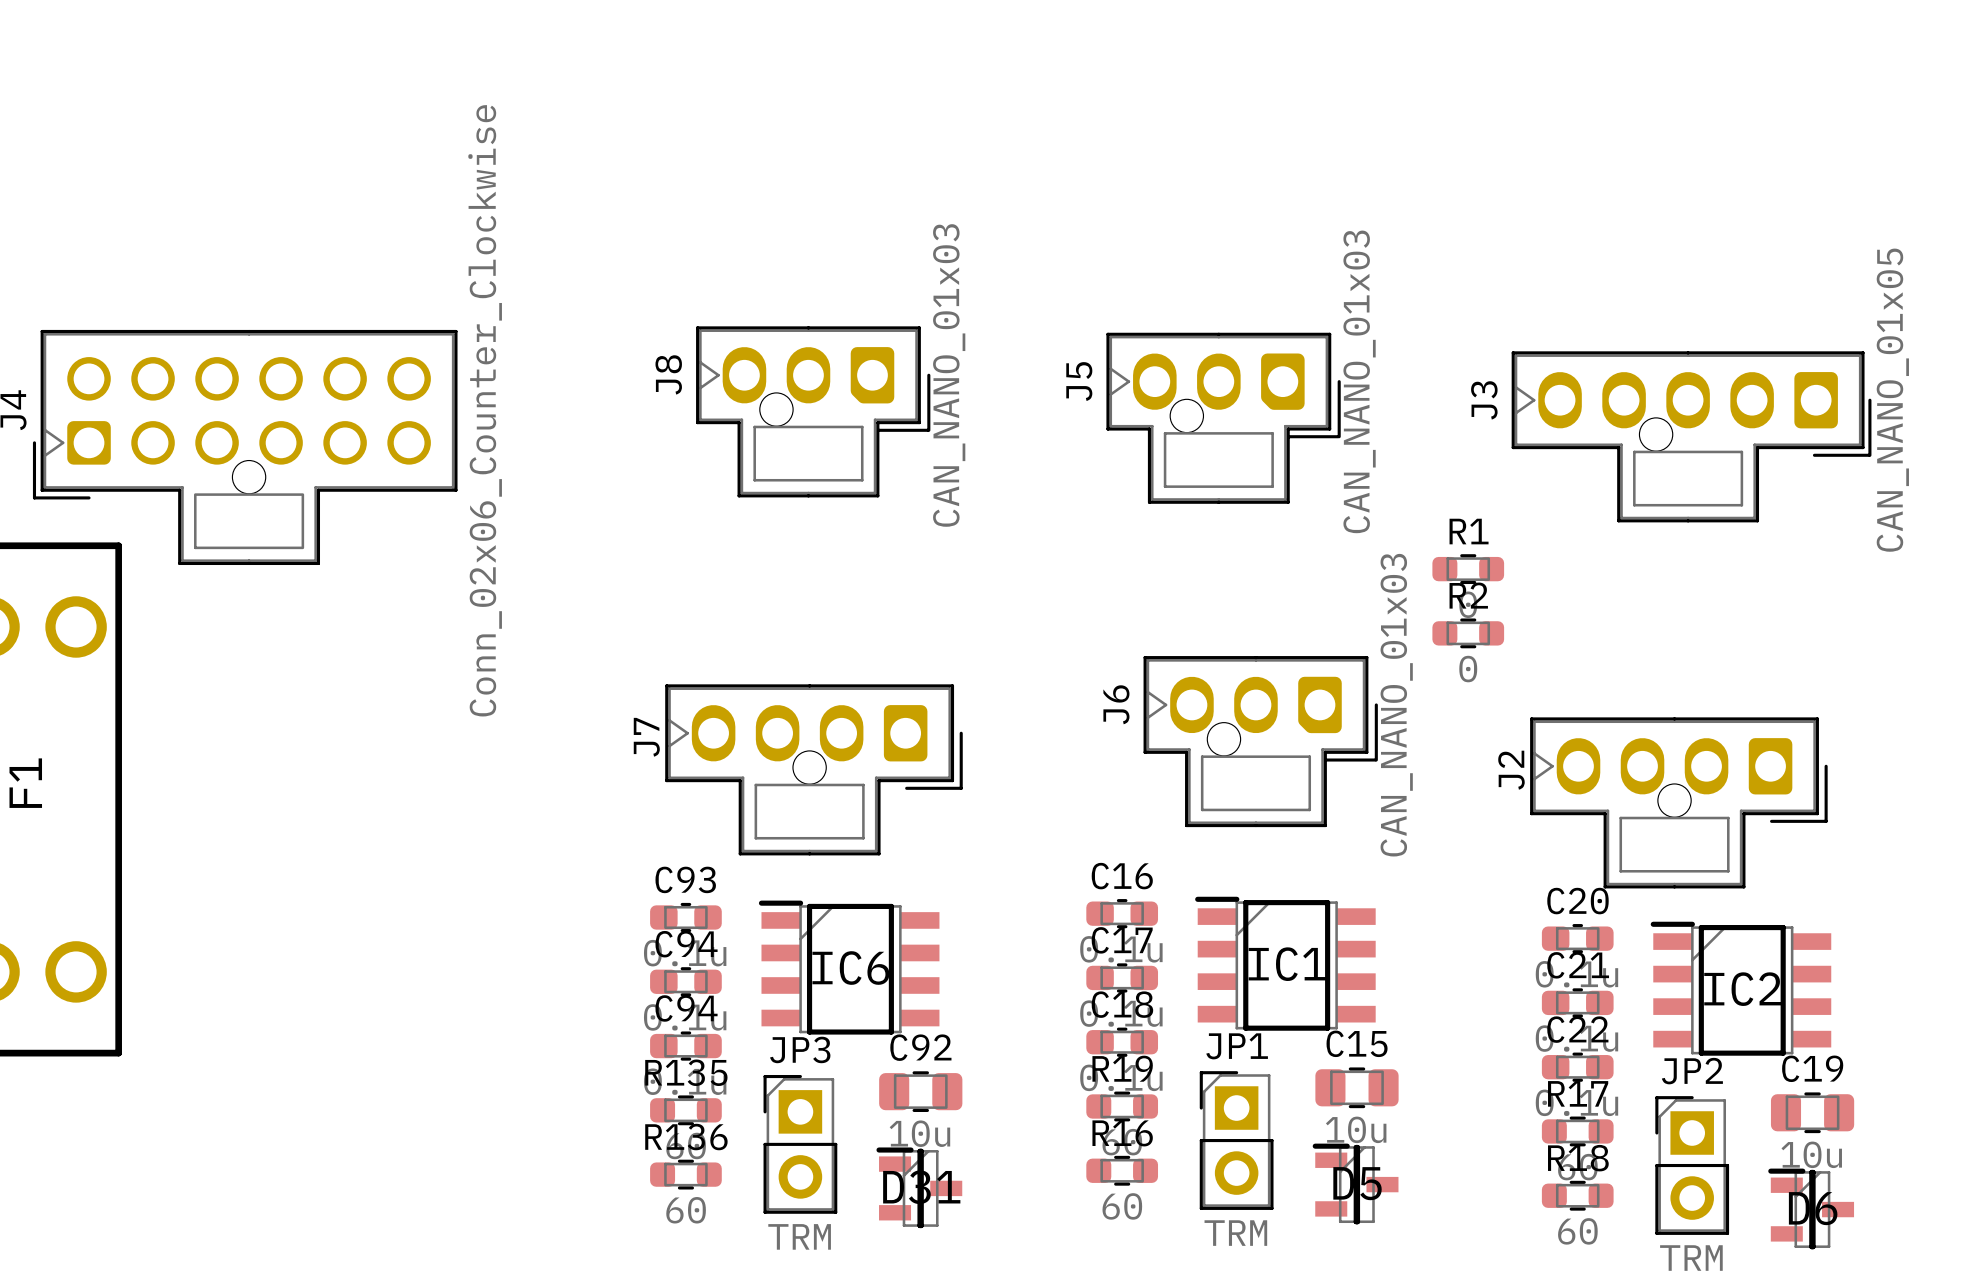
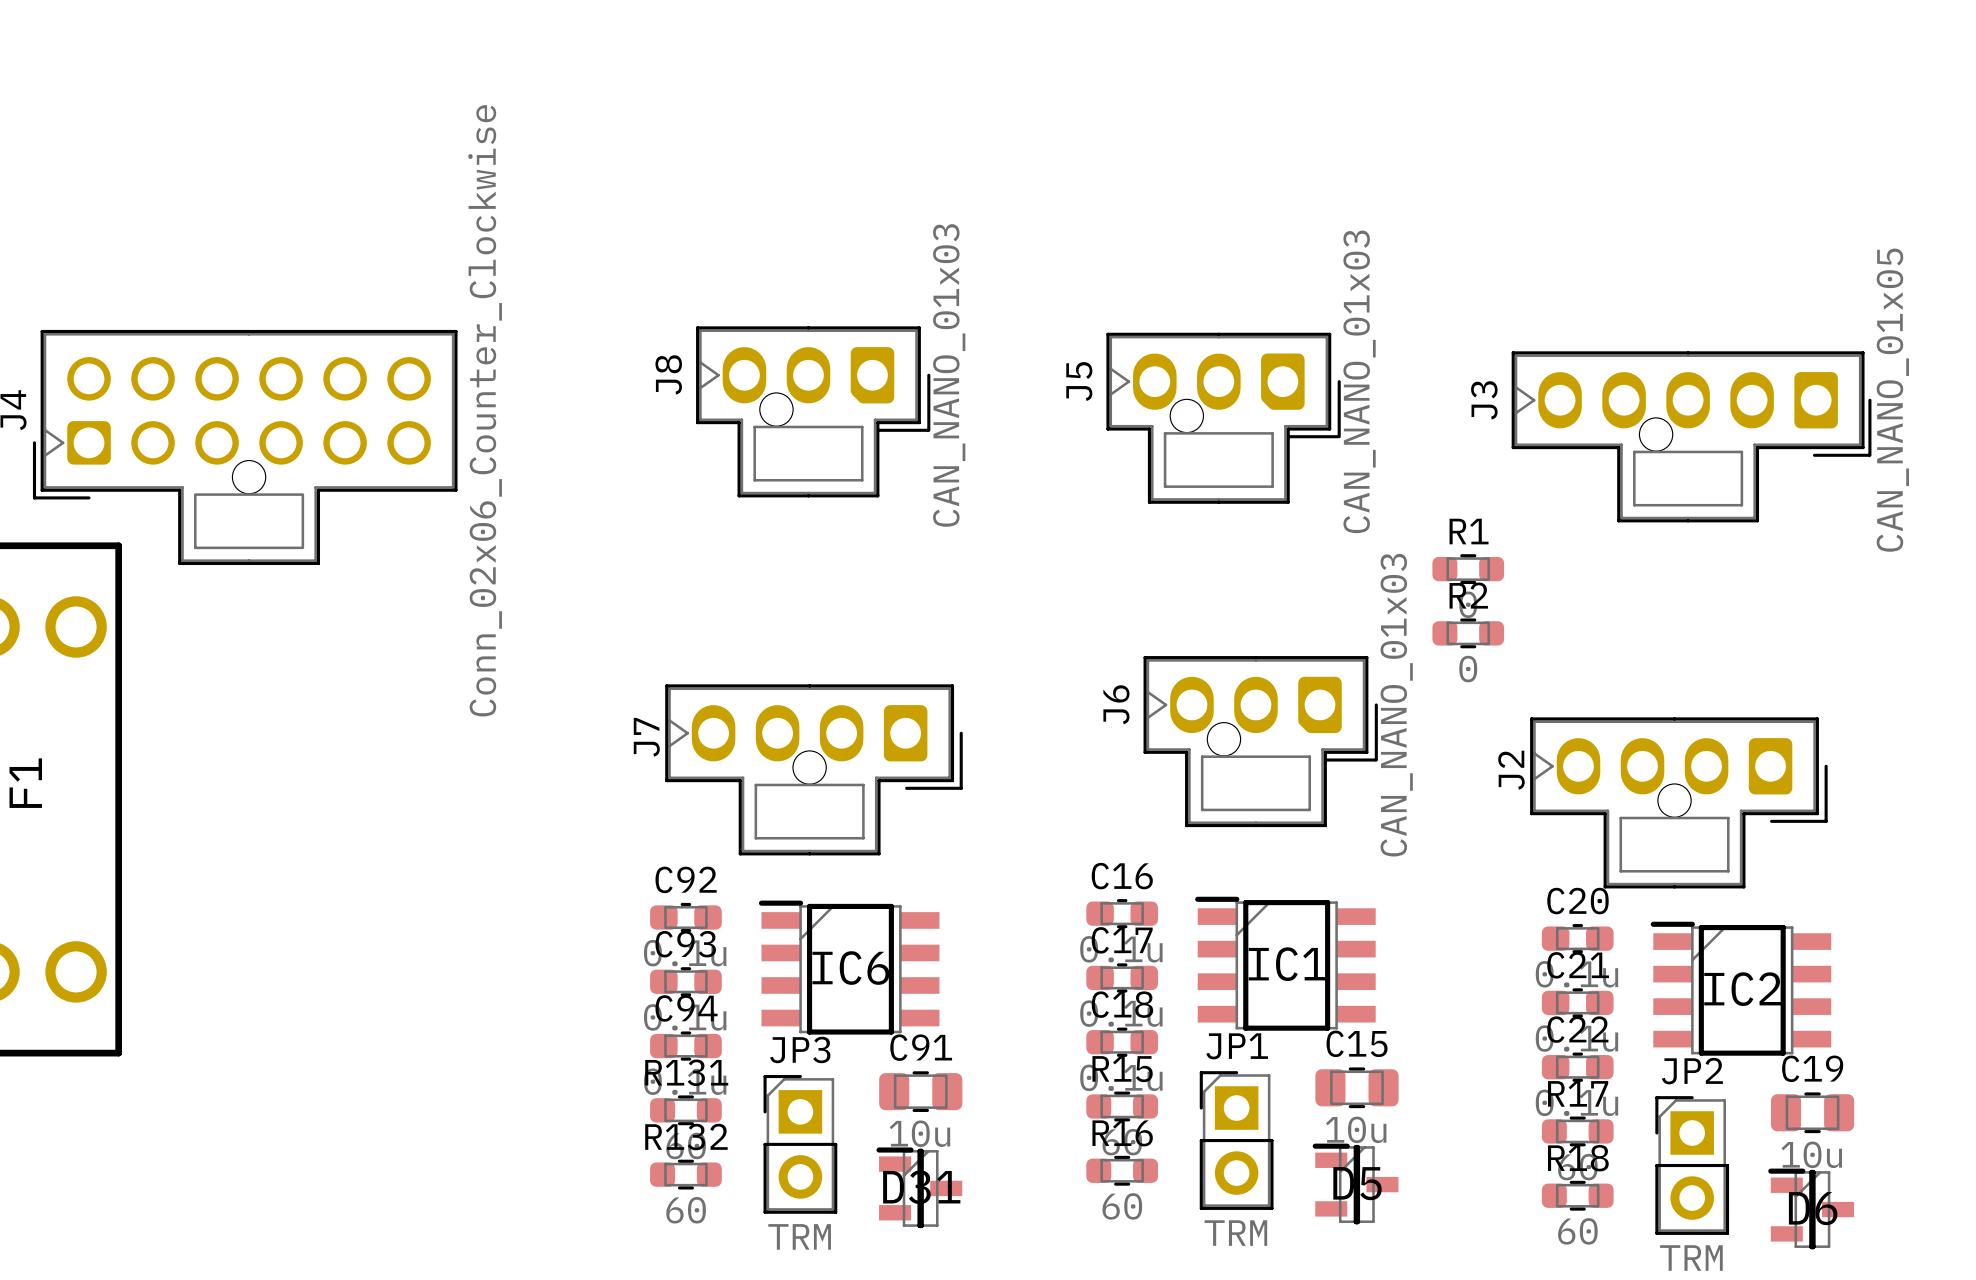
C93 name: C93 (685, 879) -> C92 (686, 879)
C94 name: C94 (686, 944) -> C93 (685, 944)
C92 name: C92 (920, 1047) -> C91 (921, 1047)
R19 name: R19 (1122, 1068) -> R15 (1122, 1069)
R135 name: R135 (686, 1072) -> R131 (686, 1072)
R136 name: R136 (686, 1137) -> R132 (686, 1137)

